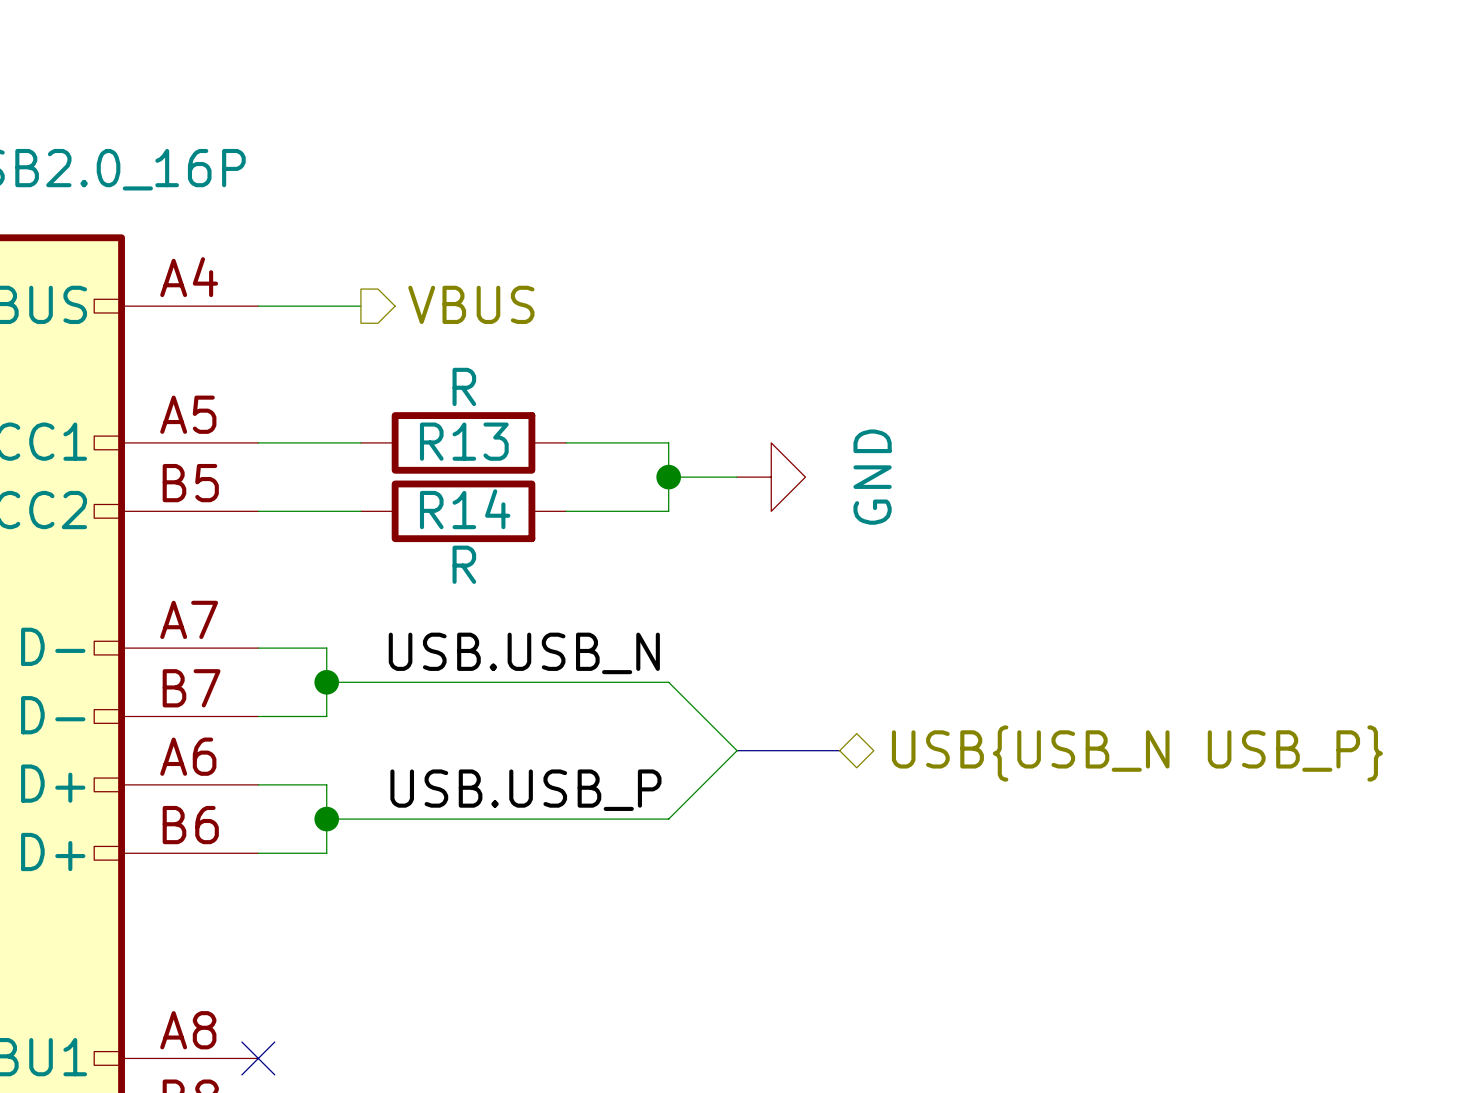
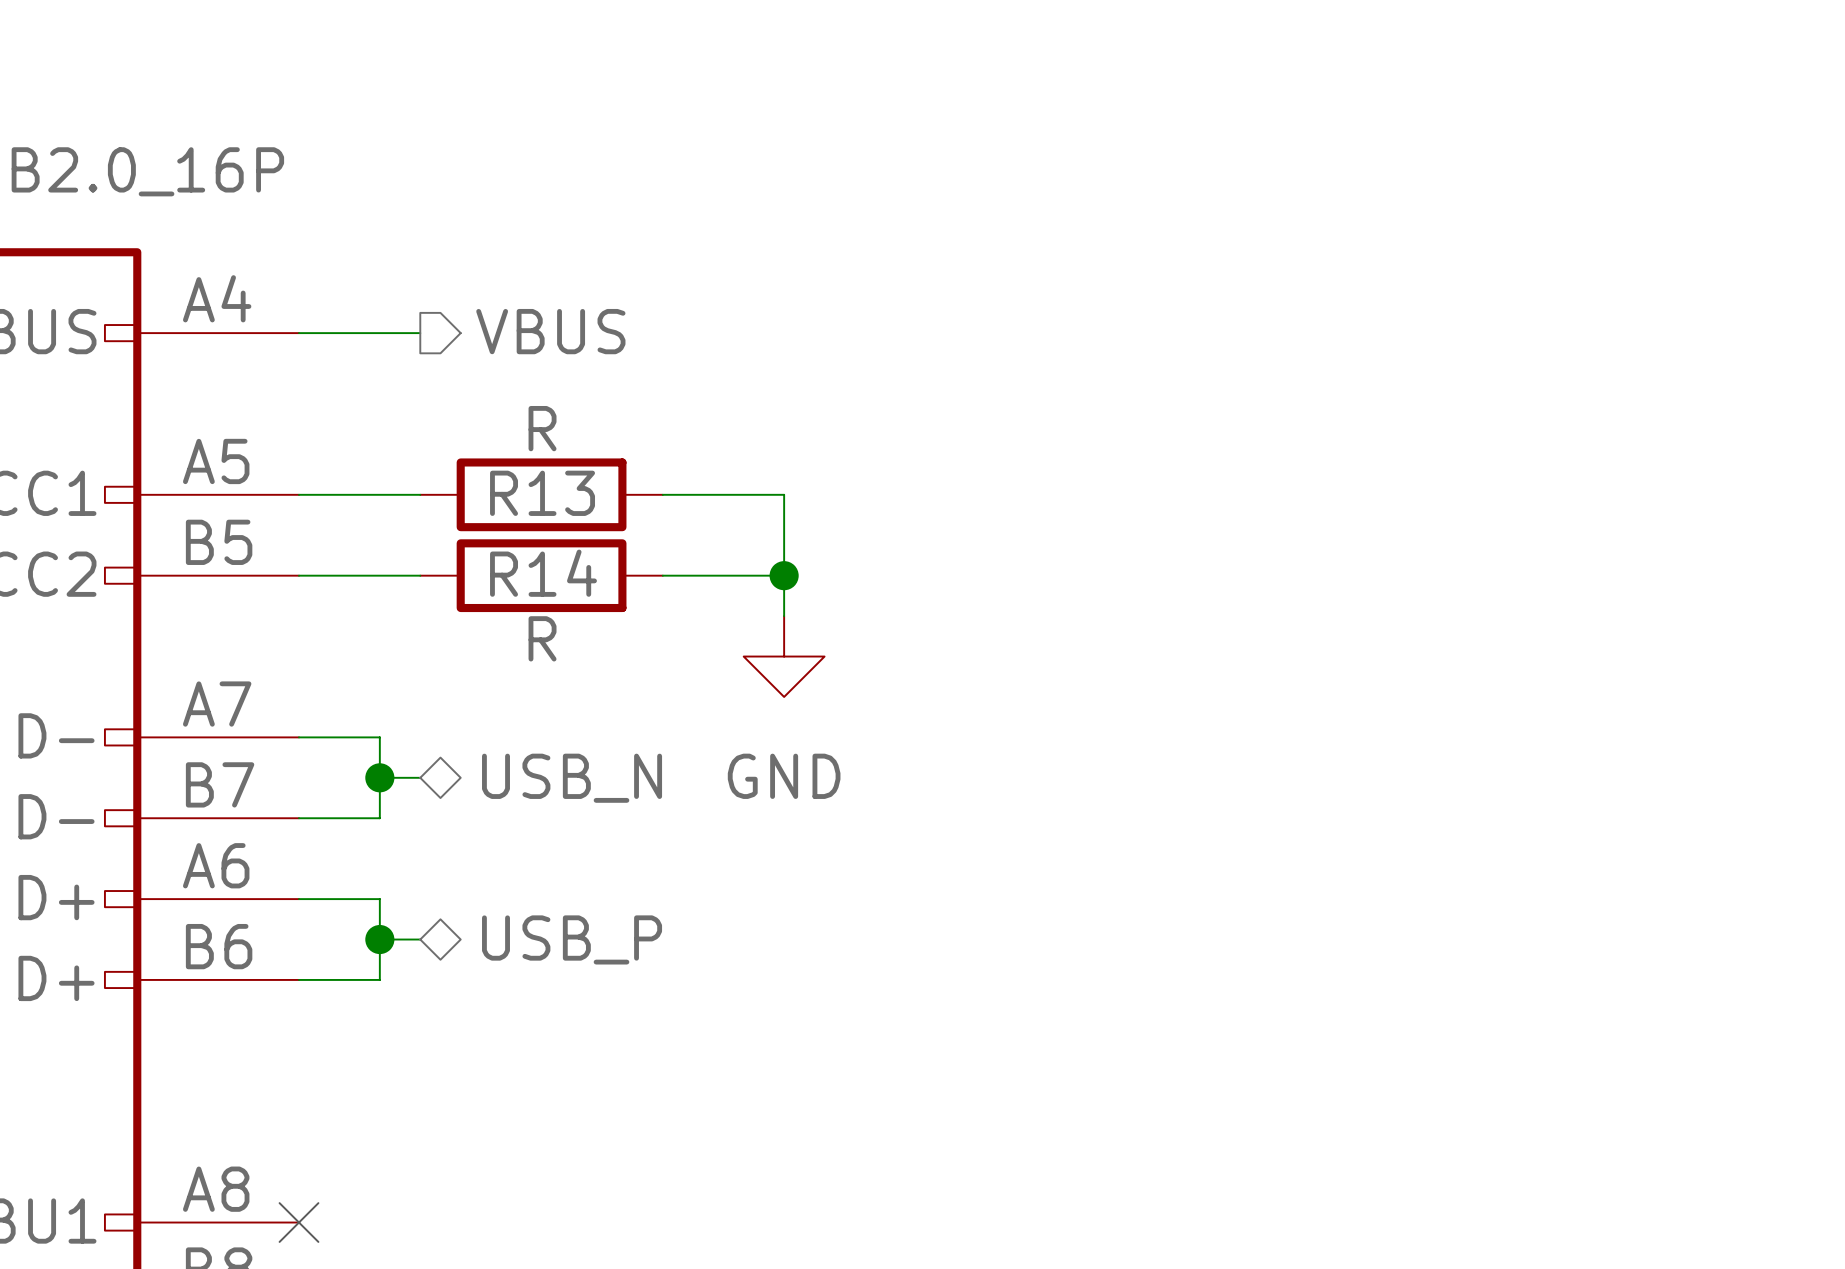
wire: (668, 477) (737, 477) -> none
junction position: (668, 477) -> (784, 575)
power symbol rotation: 0° (771, 477) -> 90° clockwise (784, 656)
power symbol position: GND (771, 477) -> GND (784, 656)
wire: none -> (784, 575) (784, 616)
label: USB.USB_N (524, 653) -> none
wire: (360, 682) (668, 682) (737, 750) (668, 819) (360, 819) -> none
hierarchical label: none -> USB_N (572, 778)
bus: (737, 750) (839, 750) -> none
hierarchical label: USB{USB_N USB_P} (1137, 753) -> none
label: USB.USB_P (525, 790) -> none
hierarchical label: none -> USB_P (572, 939)

